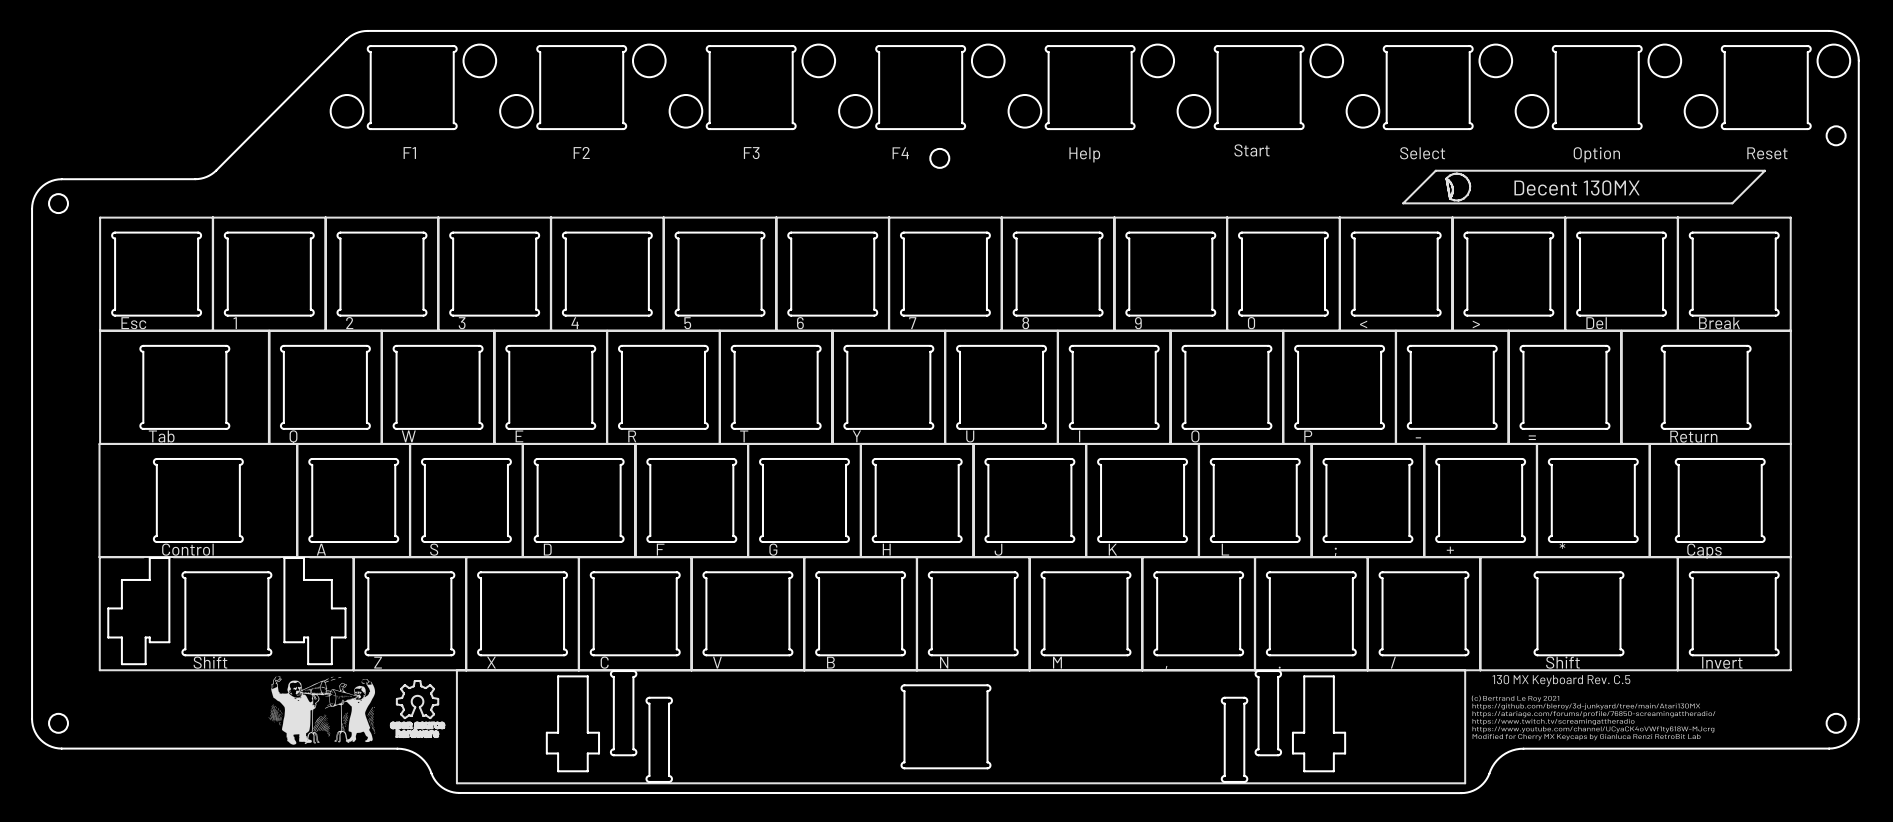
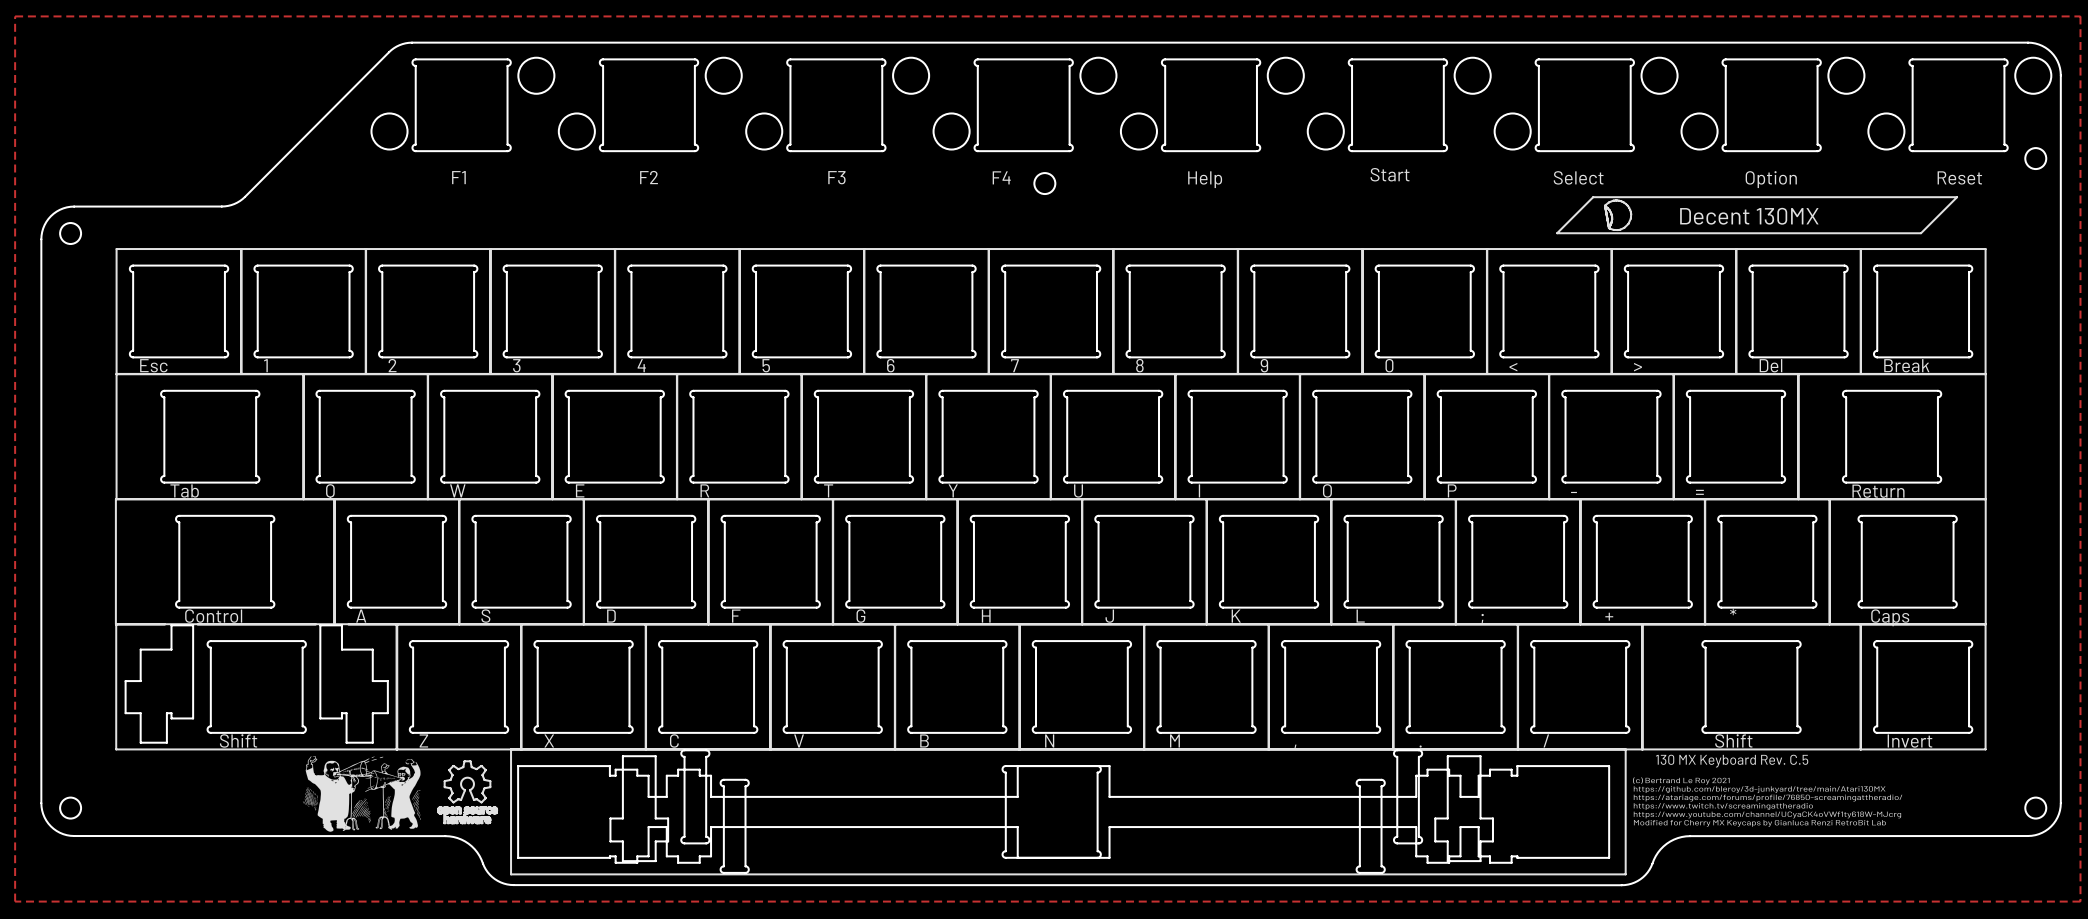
zone outline: none -> (15, 16) (15, 901) (2080, 901) (2080, 16) (15, 16)
board edge: none -> (518, 766) (518, 857) (615, 856) (615, 862) (637, 862) (637, 856) (648, 856) (648, 827) (666, 827) (666, 856) (678, 856) (678, 862) (699, 862) (699, 856) (711, 856) (711, 827) (1017, 827) (1017, 857) (1109, 857) (1109, 827) (1416, 827) (1416, 856) (1427, 856) (1427, 862) (1449, 862) (1449, 856) (1460, 856) (1460, 827) (1478, 827) (1478, 856) (1489, 856) (1489, 862) (1511, 862) (1511, 856) (1609, 857) (1609, 766) (1517, 766) (1517, 775) (1511, 775) (1511, 769) (1489, 769) (1489, 775) (1478, 775) (1478, 796) (1460, 796) (1460, 775) (1449, 775) (1449, 769) (1427, 769) (1427, 775) (1416, 775) (1416, 796) (1109, 796) (1109, 766) (1017, 766) (1017, 796) (711, 796) (711, 775) (699, 775) (699, 769) (678, 769) (678, 775) (666, 775) (666, 796) (648, 796) (648, 775) (637, 775) (637, 769) (615, 769) (615, 775) (609, 775) (609, 766) (518, 766)

